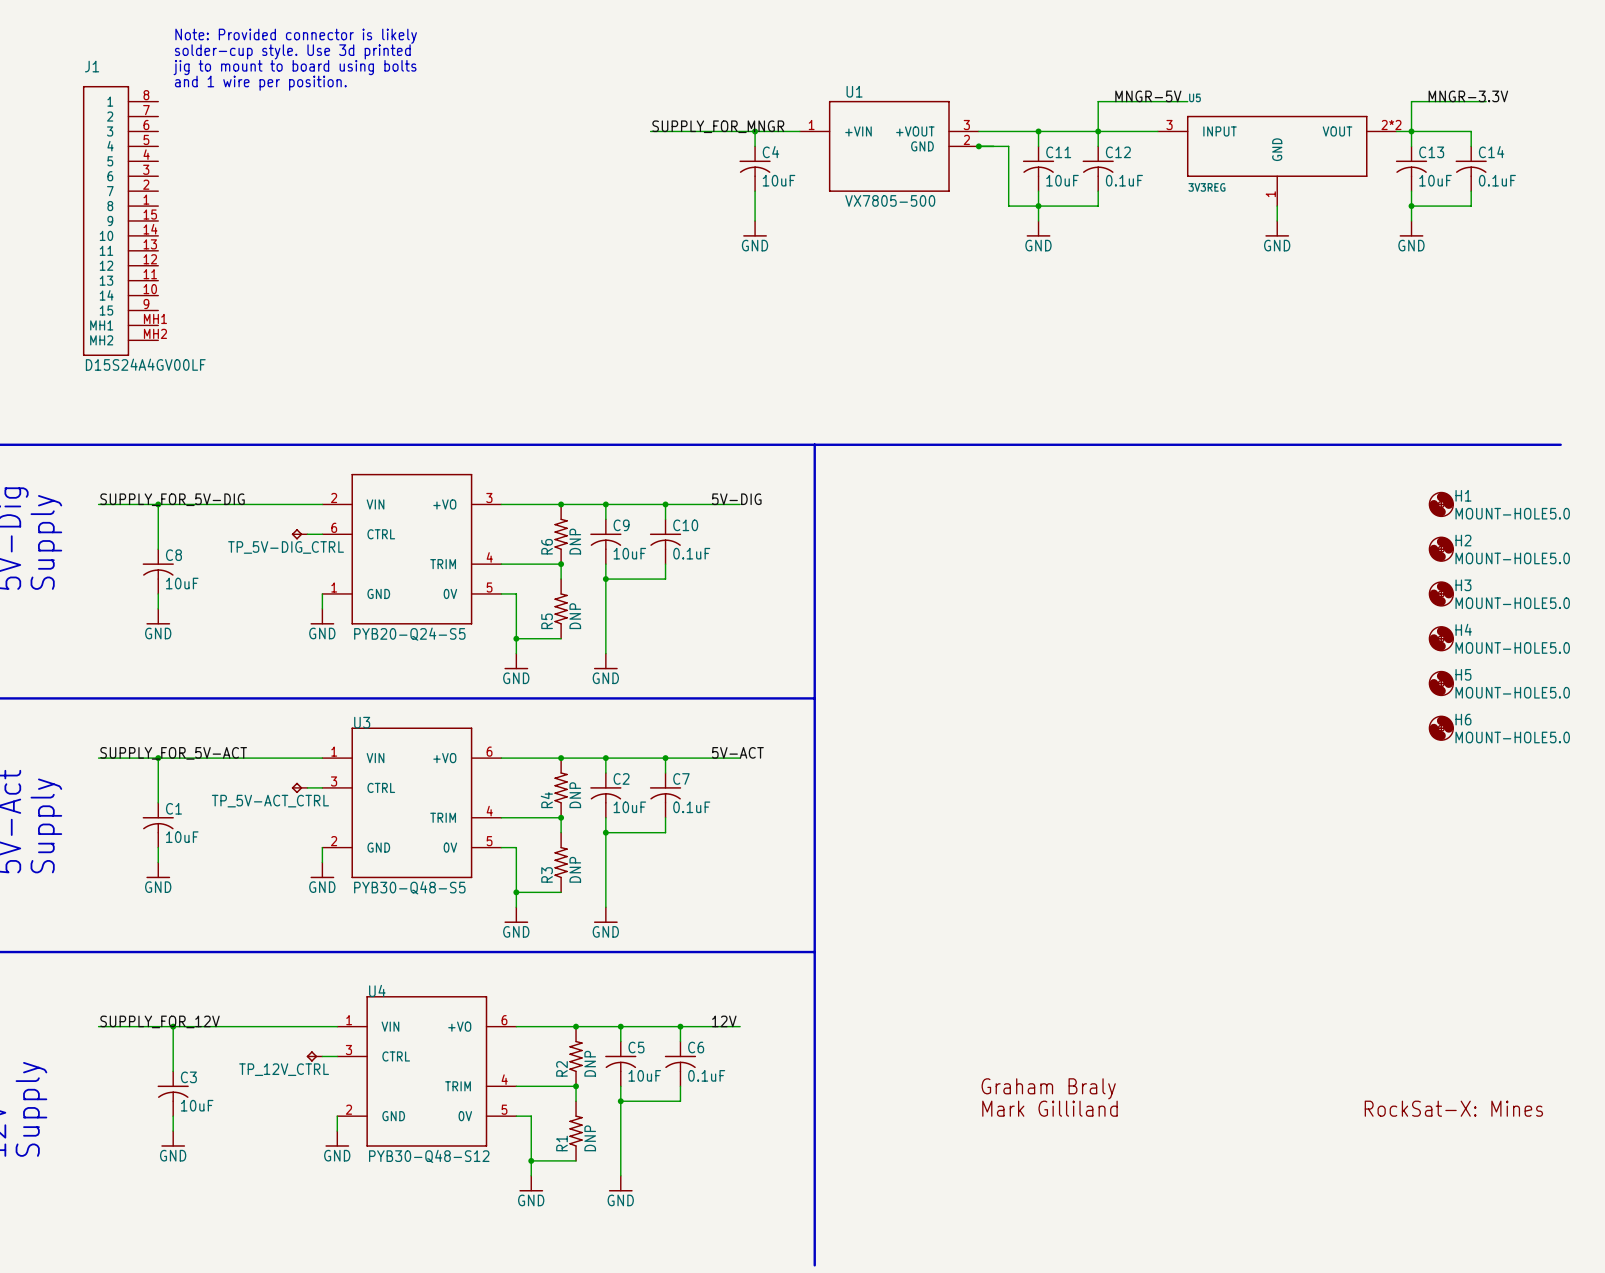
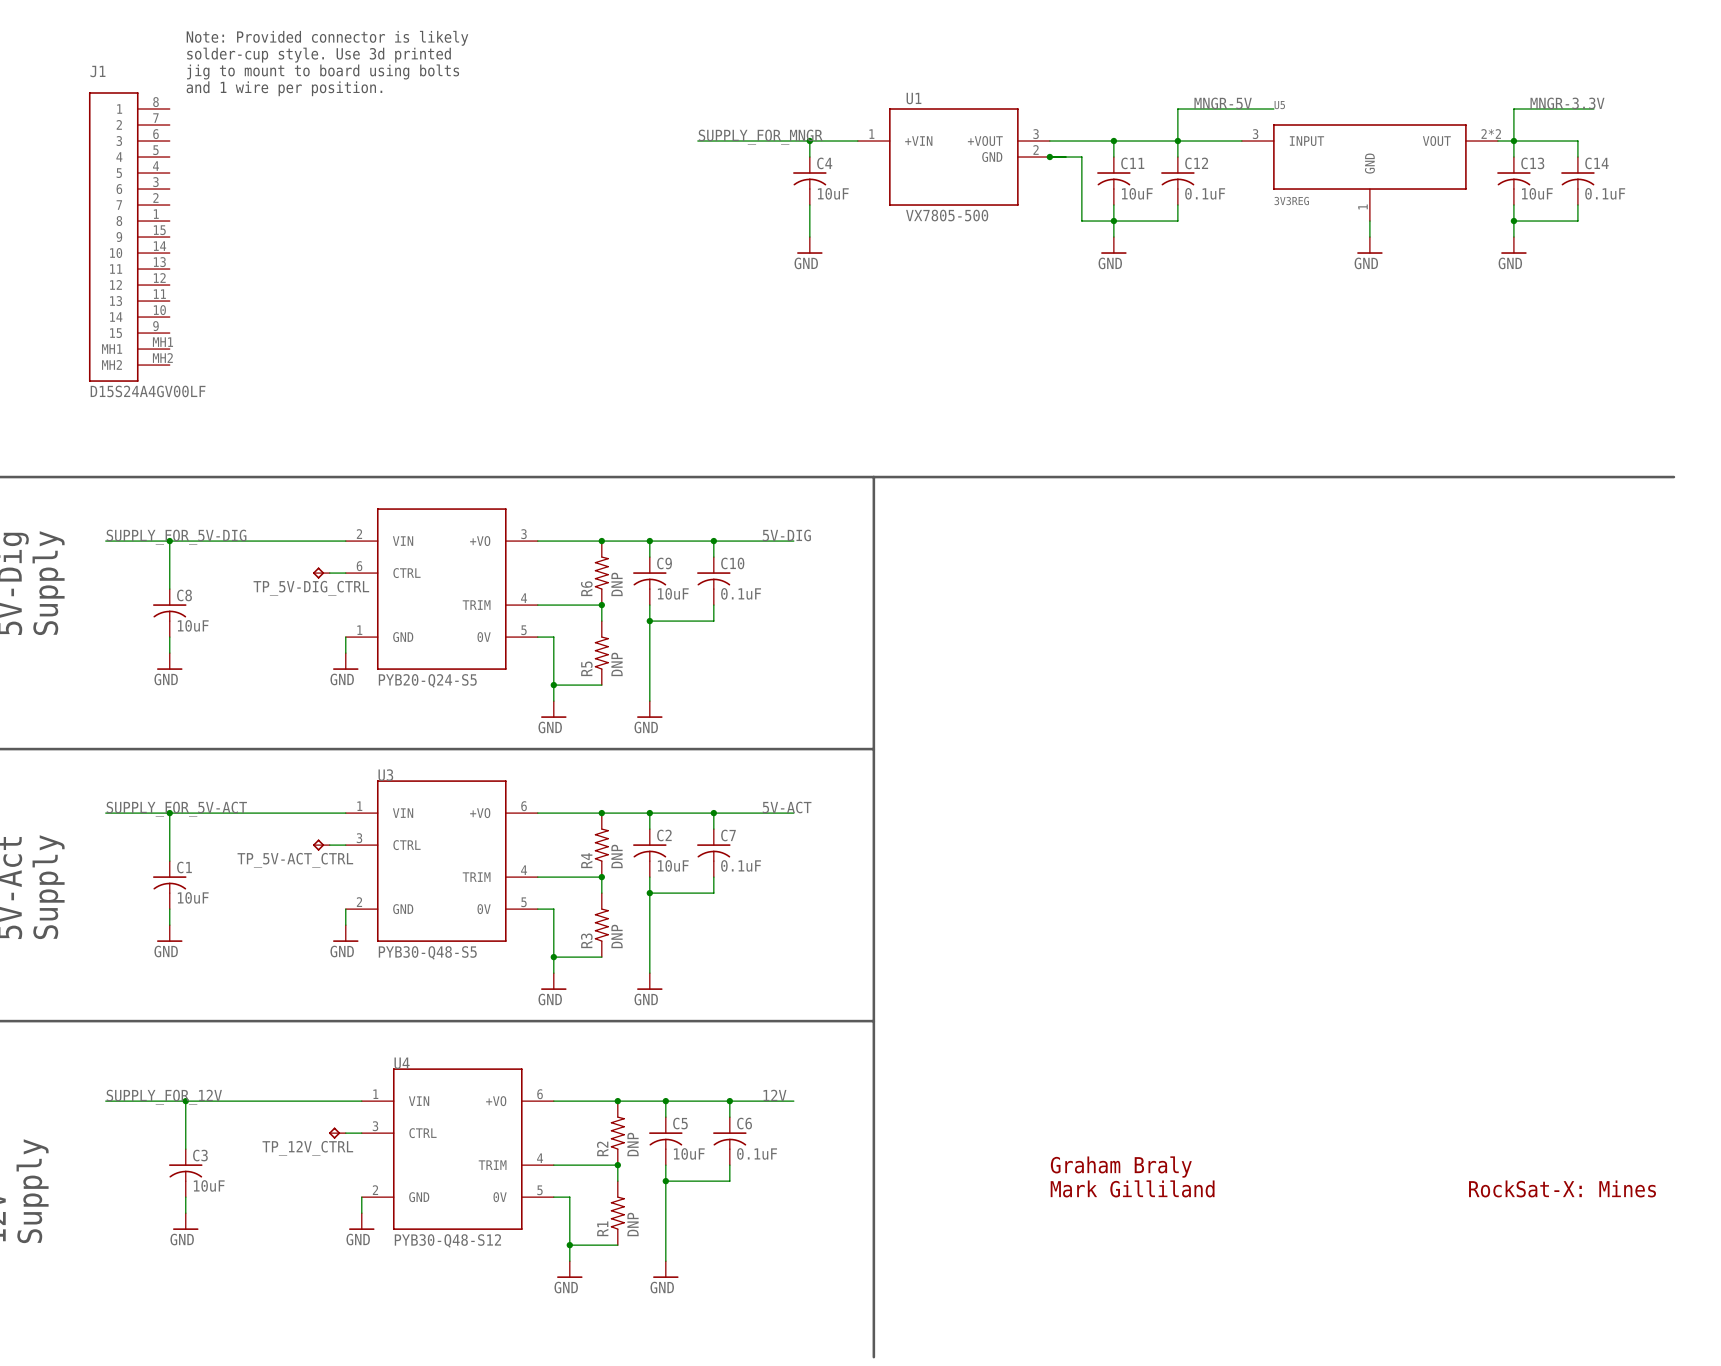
H1: MOUNT-HOLE5.0 (1441, 504) -> none
H2: MOUNT-HOLE5.0 (1441, 549) -> none
H3: MOUNT-HOLE5.0 (1441, 593) -> none
H4: MOUNT-HOLE5.0 (1441, 638) -> none
H5: MOUNT-HOLE5.0 (1441, 683) -> none
H6: MOUNT-HOLE5.0 (1441, 728) -> none

